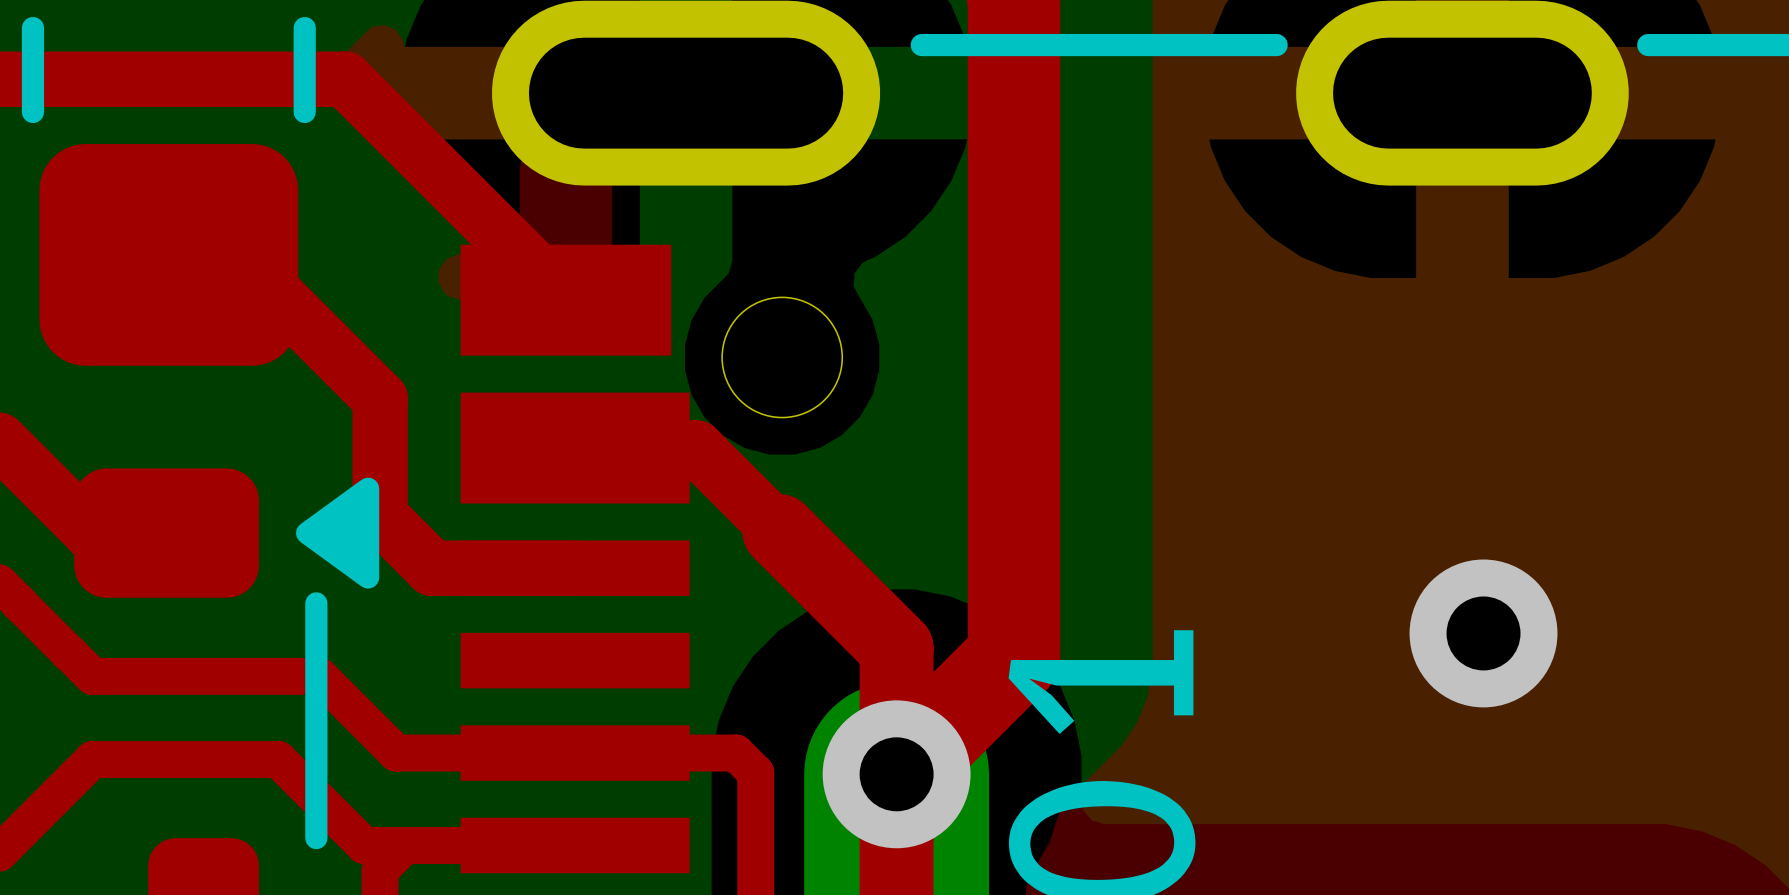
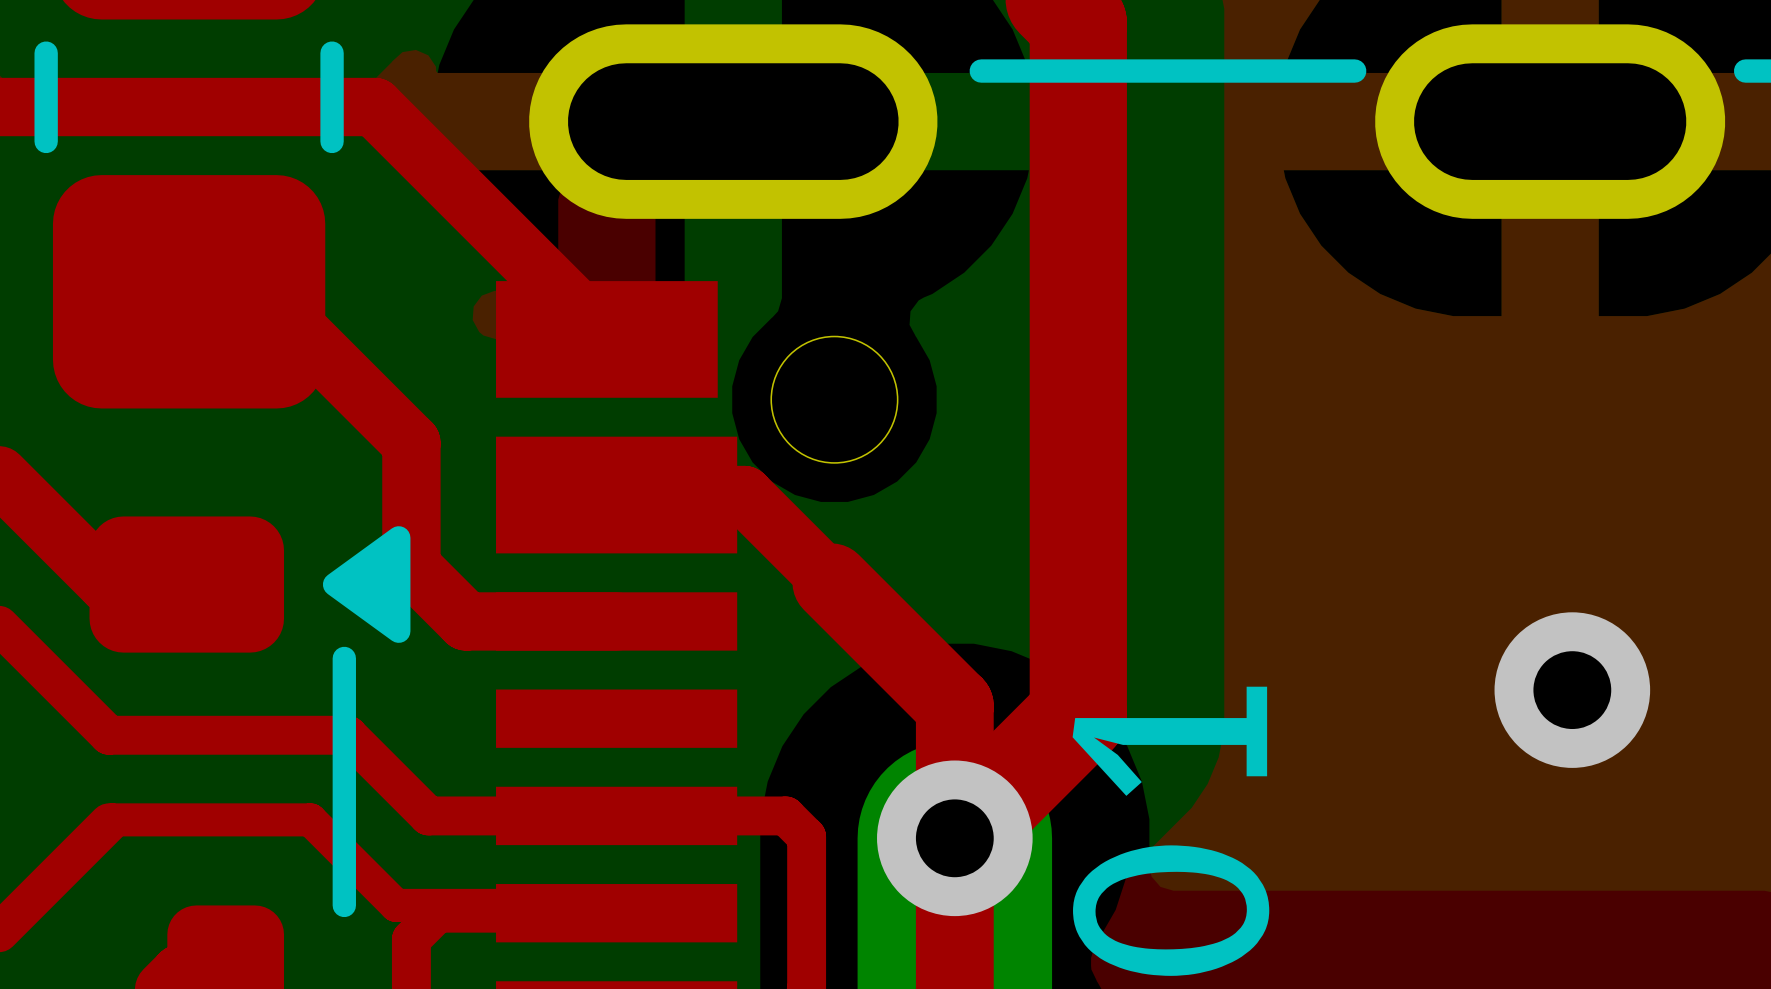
top track: (92, 759) (278, 759) (364, 845) (405, 845) -> (108, 822) (111, 819) (310, 819) (396, 905) (517, 905) (525, 913)

